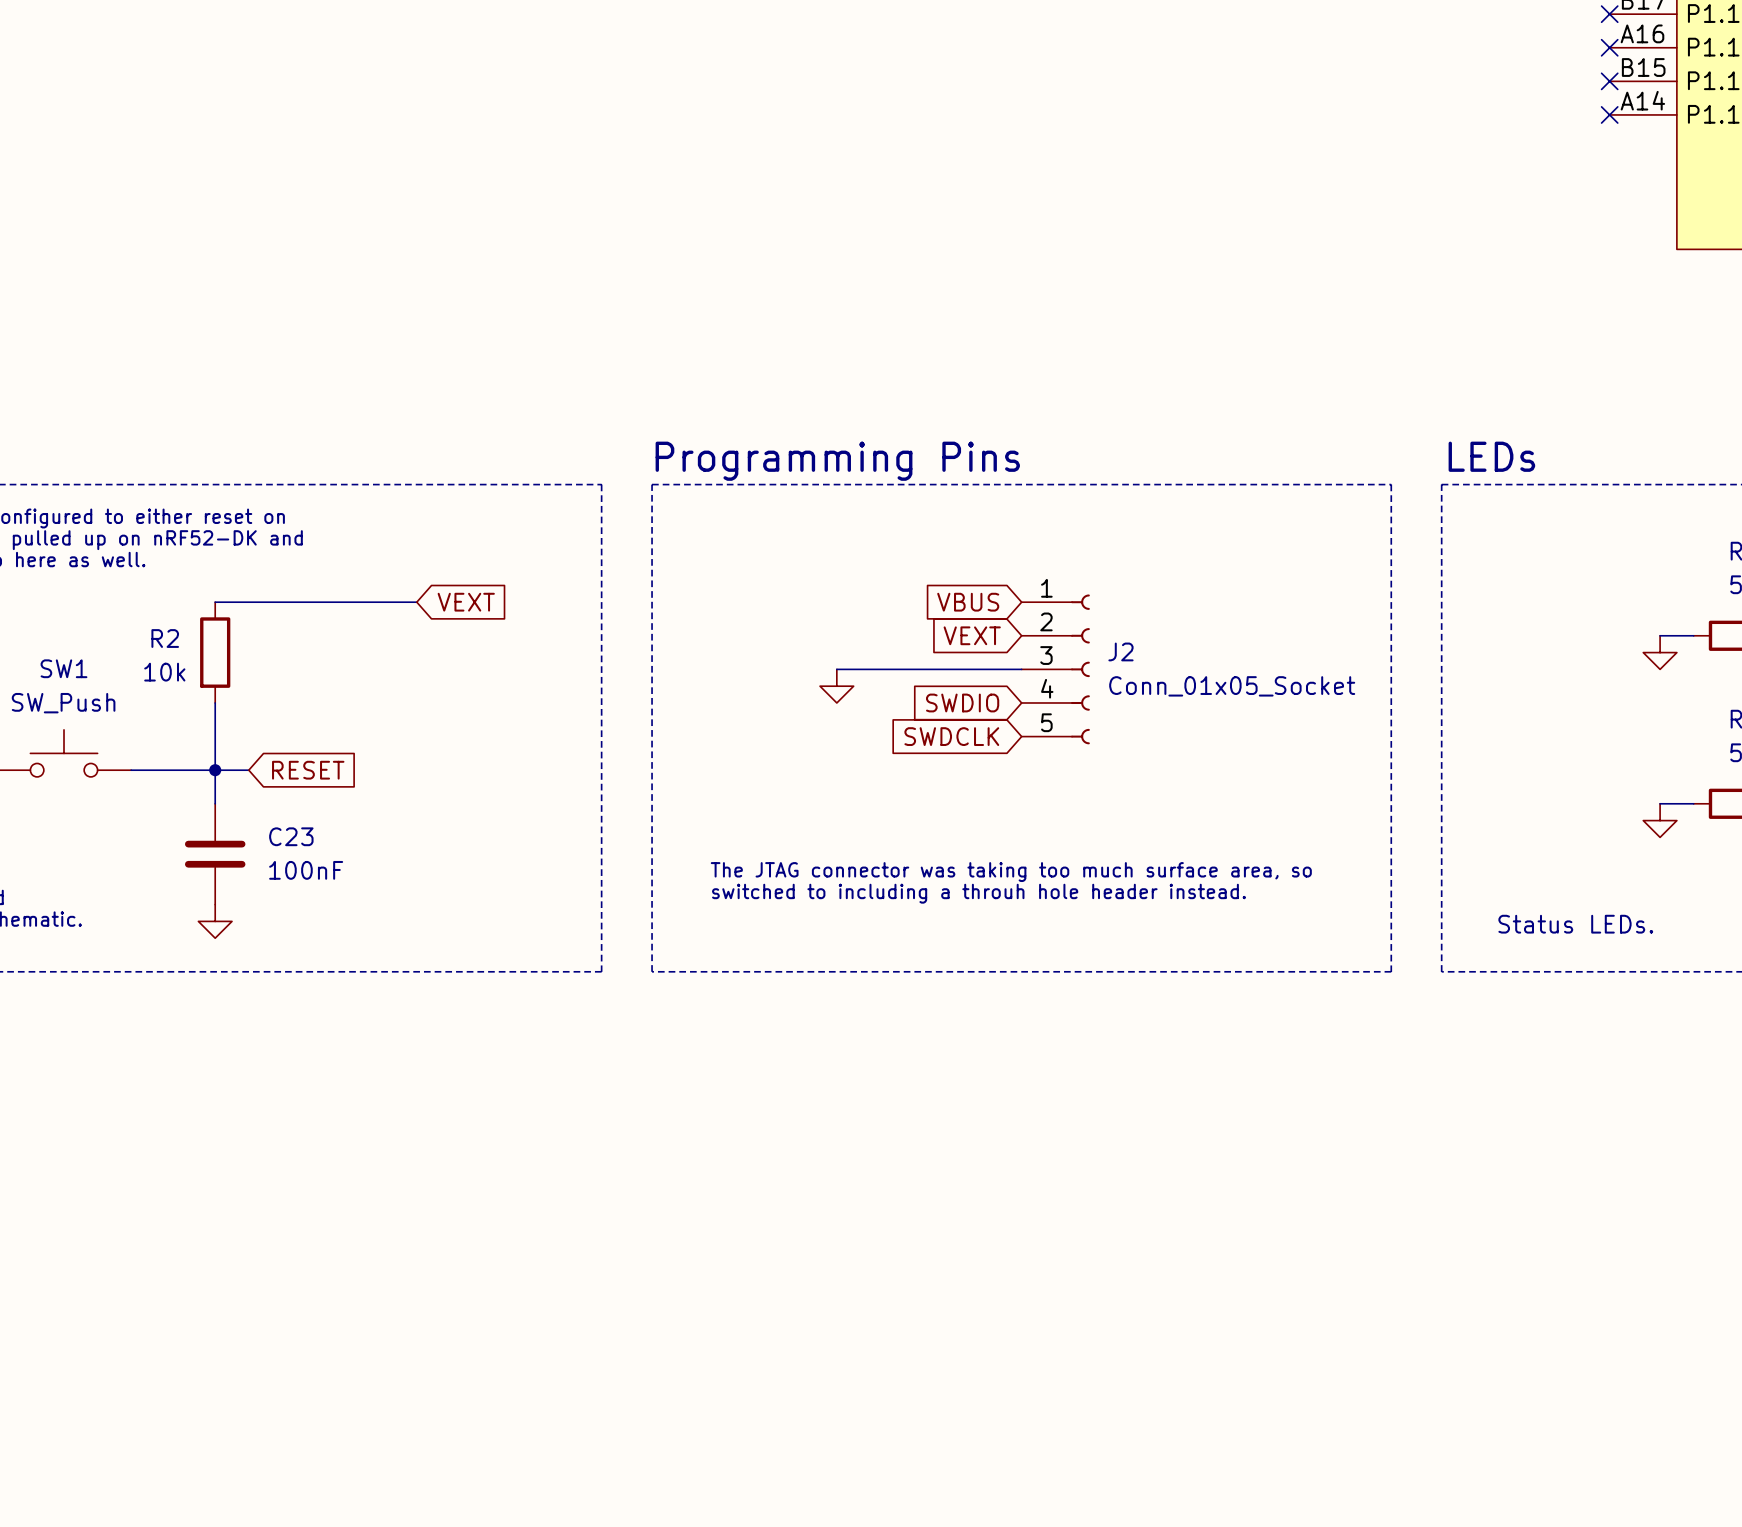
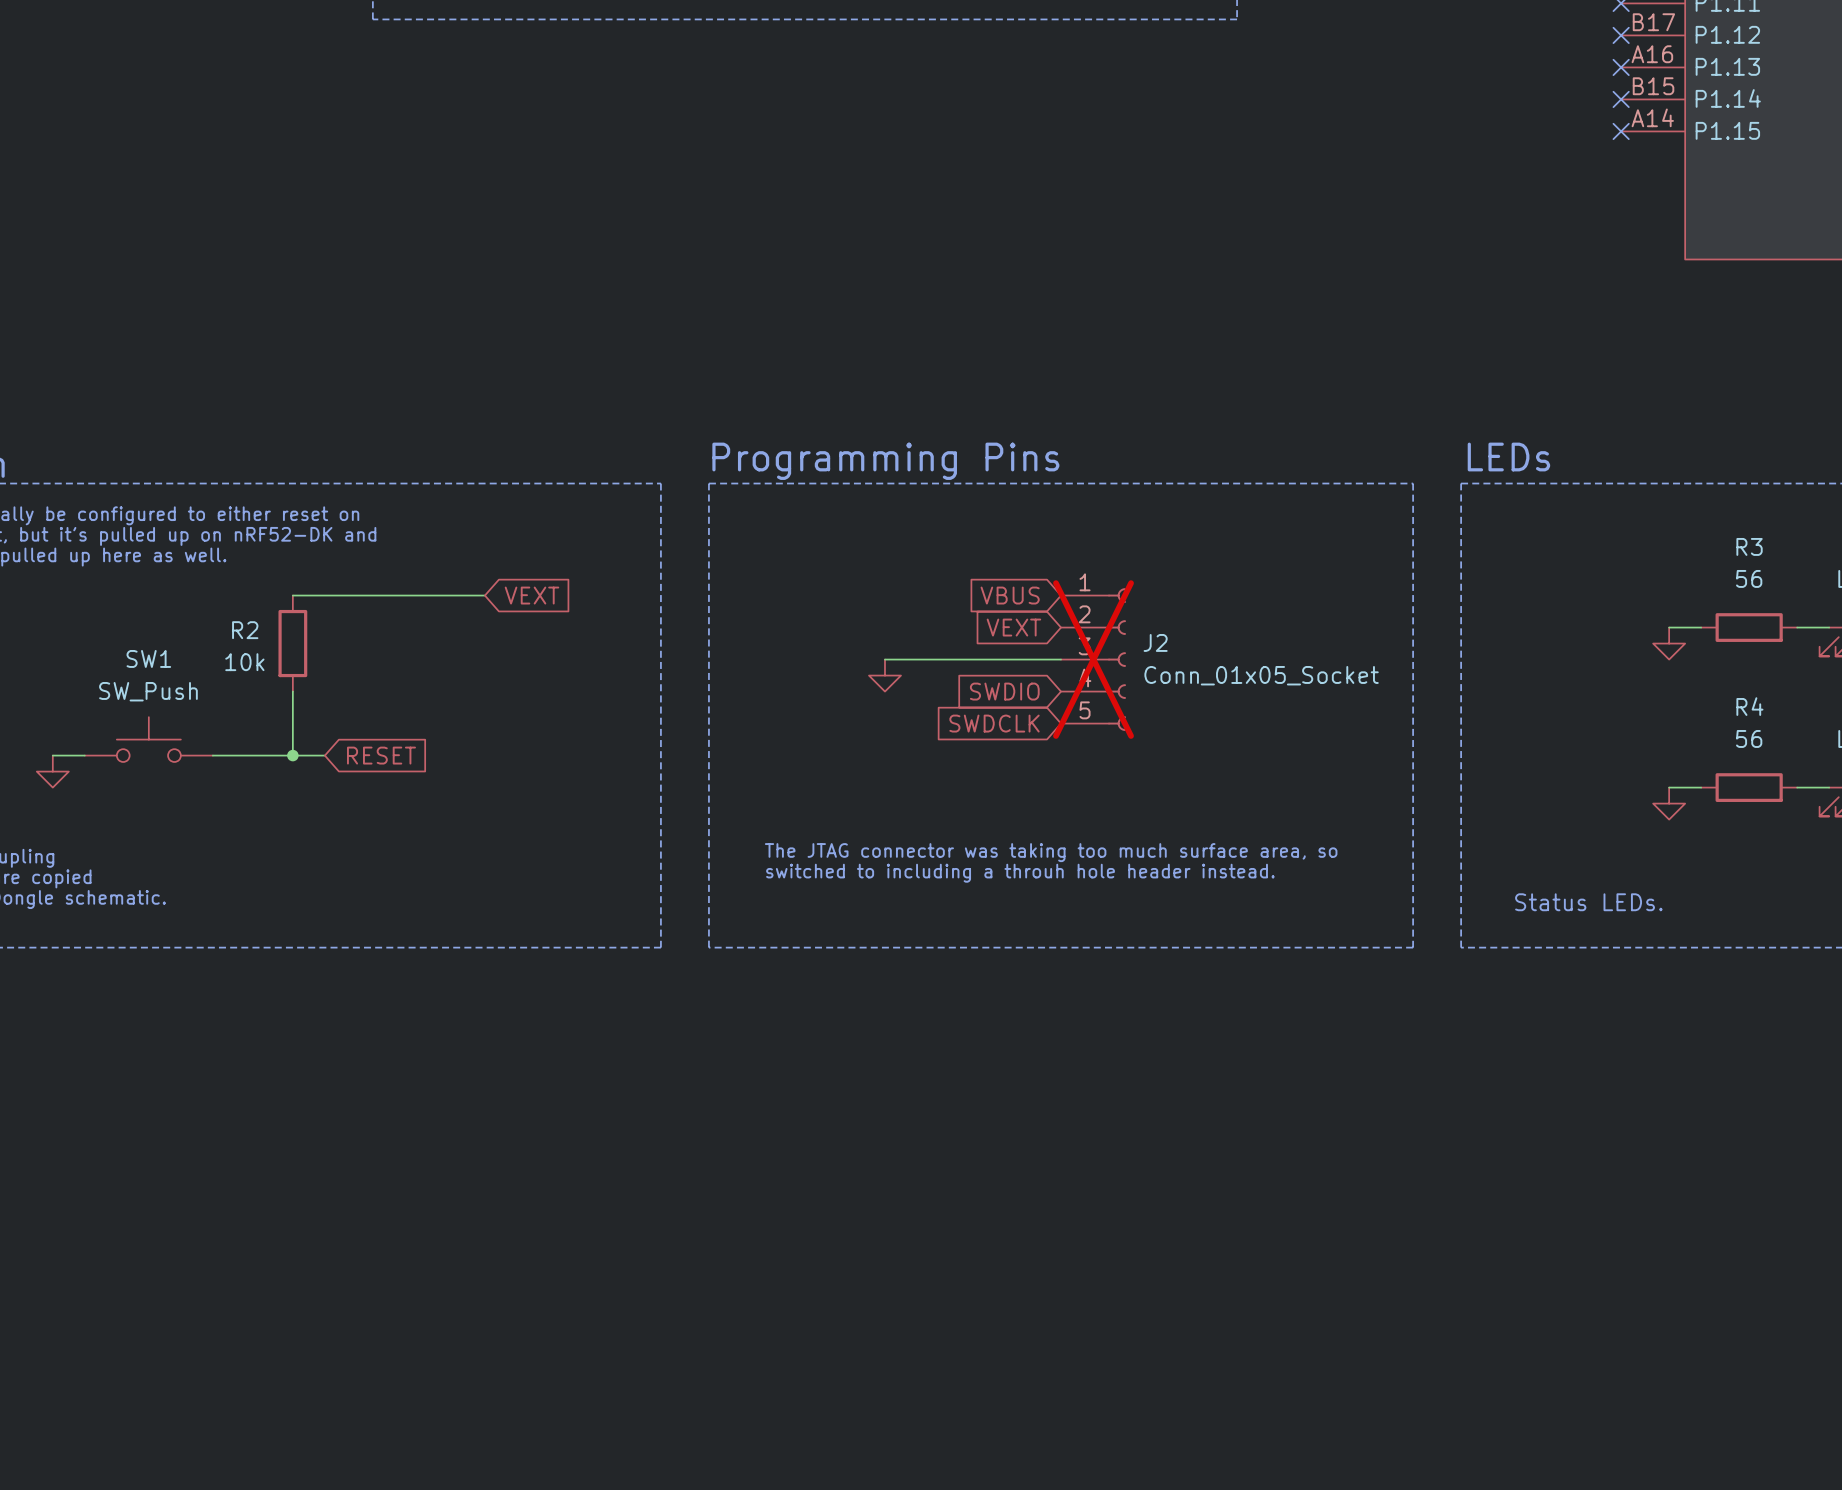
J2 do-not-place cross: none -> (1093, 659)
wire: (215, 770) (215, 803) -> none
C23: 100nF (215, 854) -> none
power symbol: (215, 921) -> none

